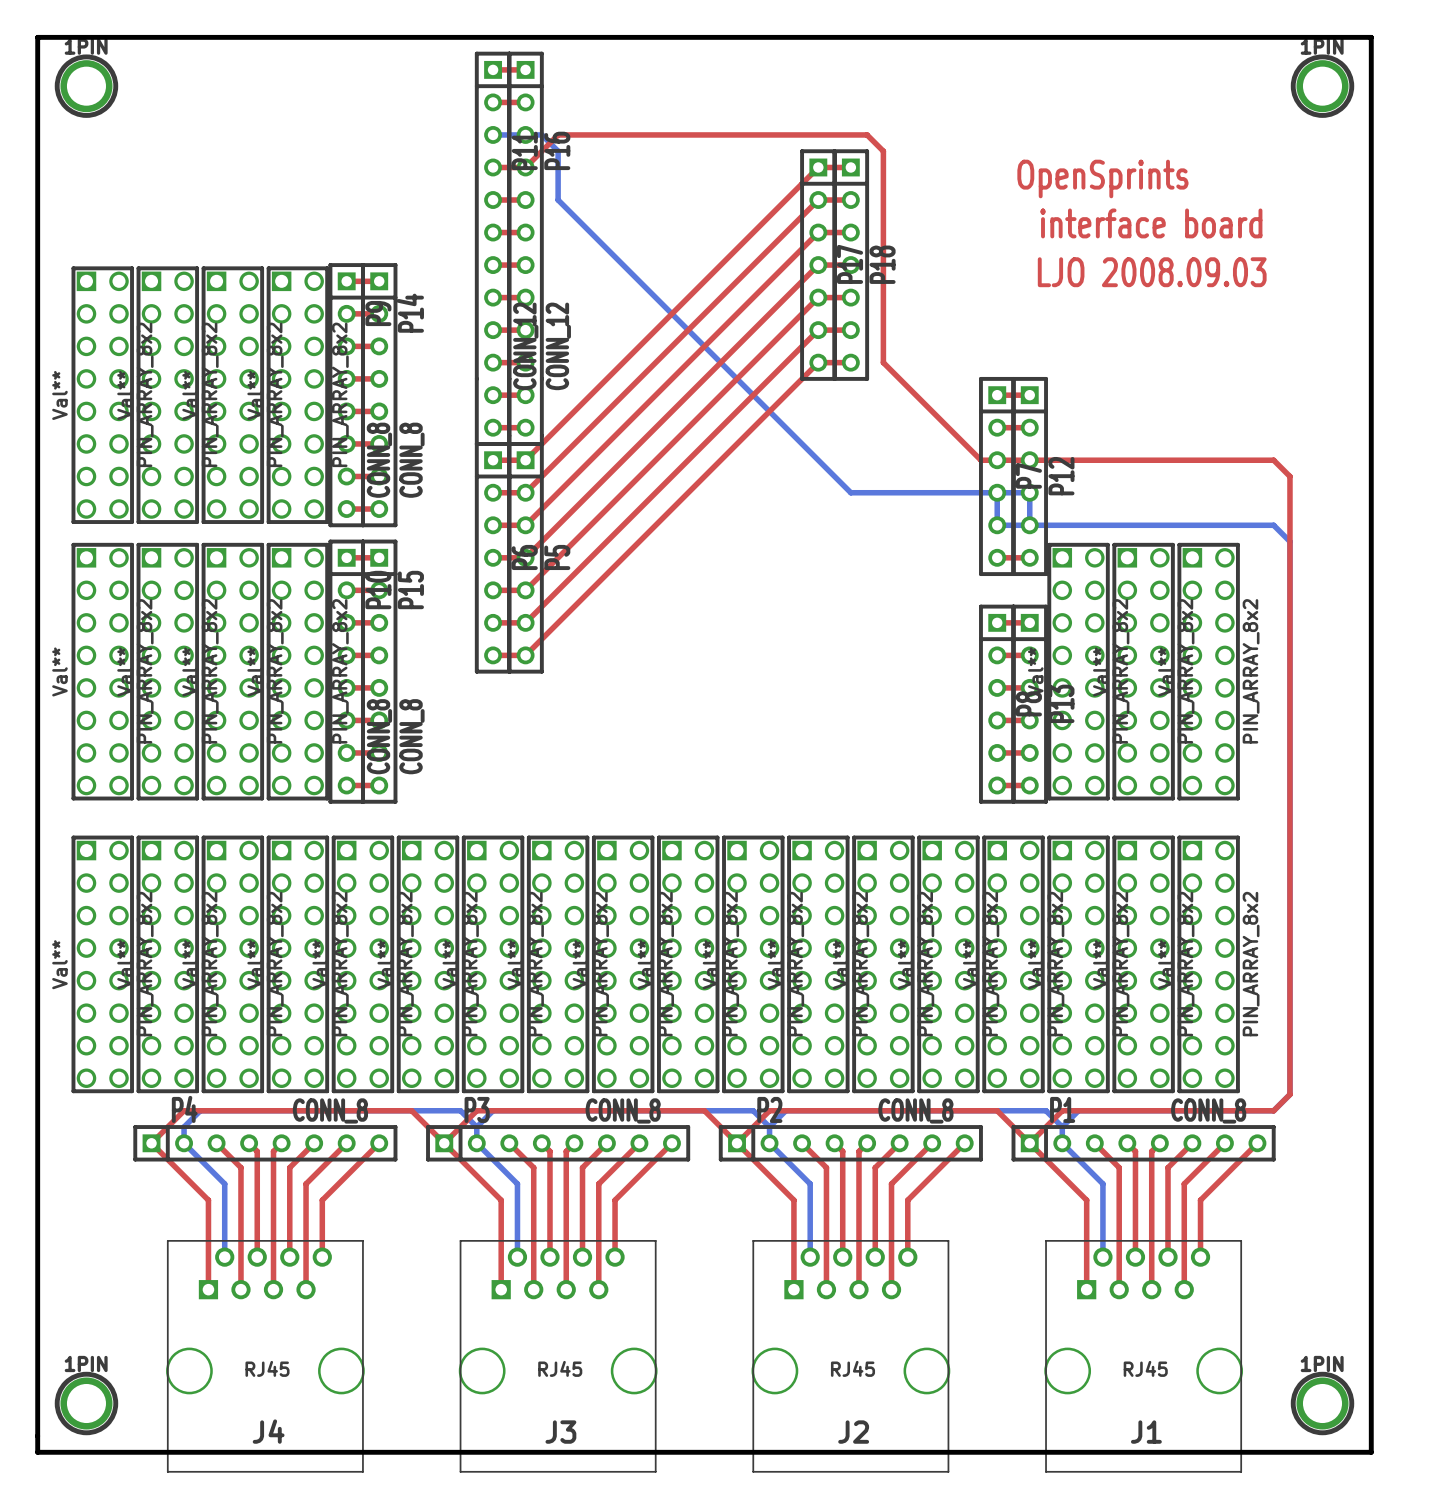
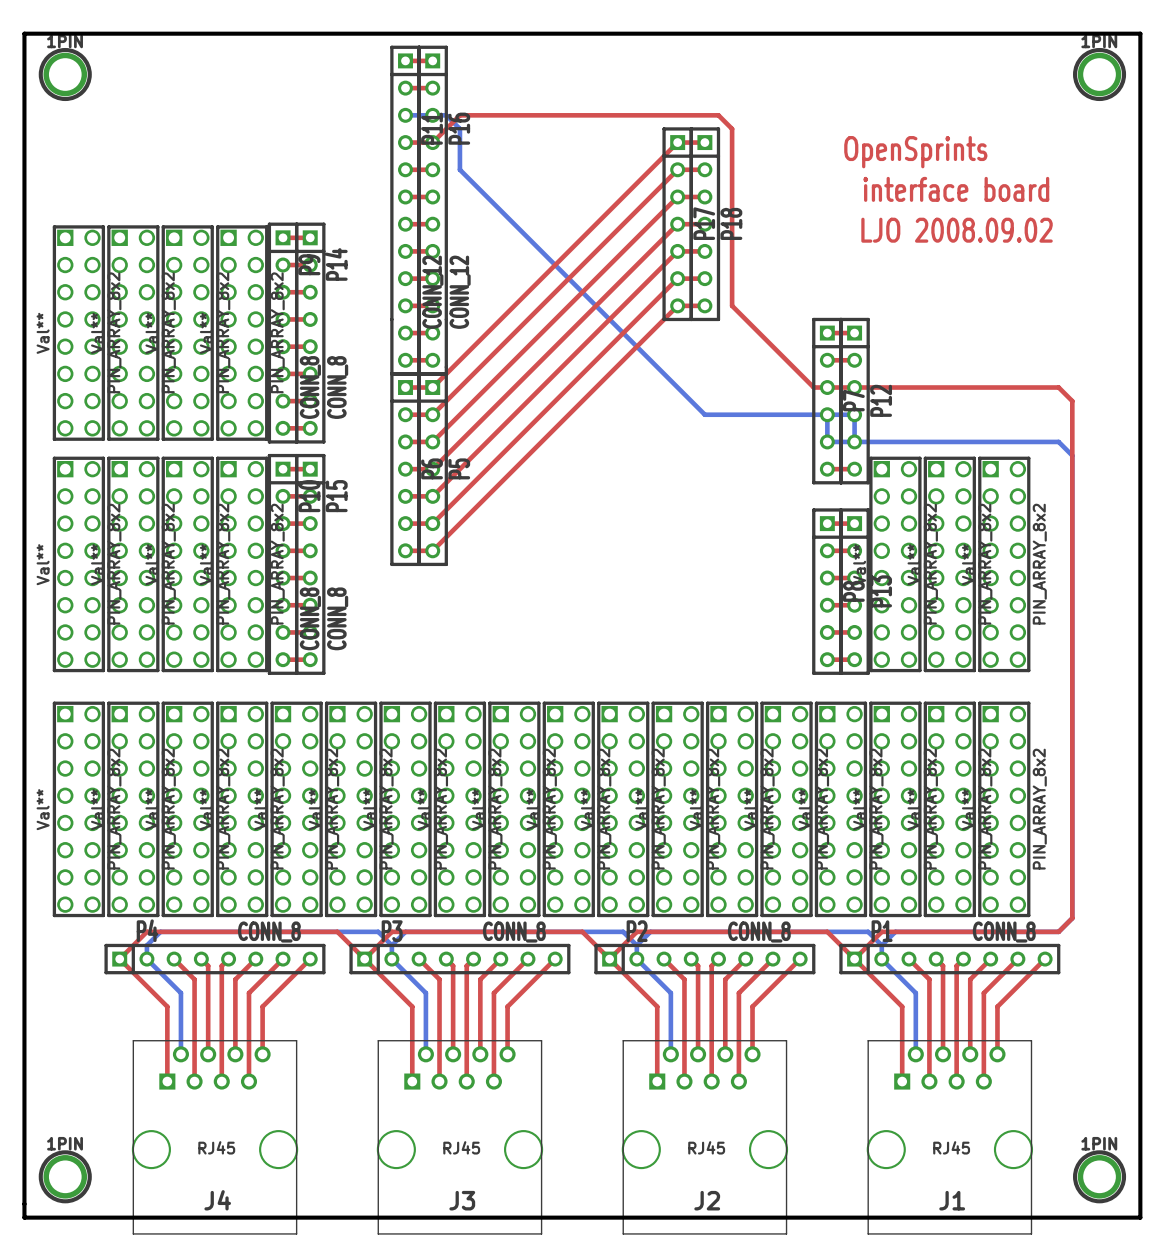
text: LJO 2008.09.03 (1152, 272) -> LJO 2008.09.02 (957, 230)

